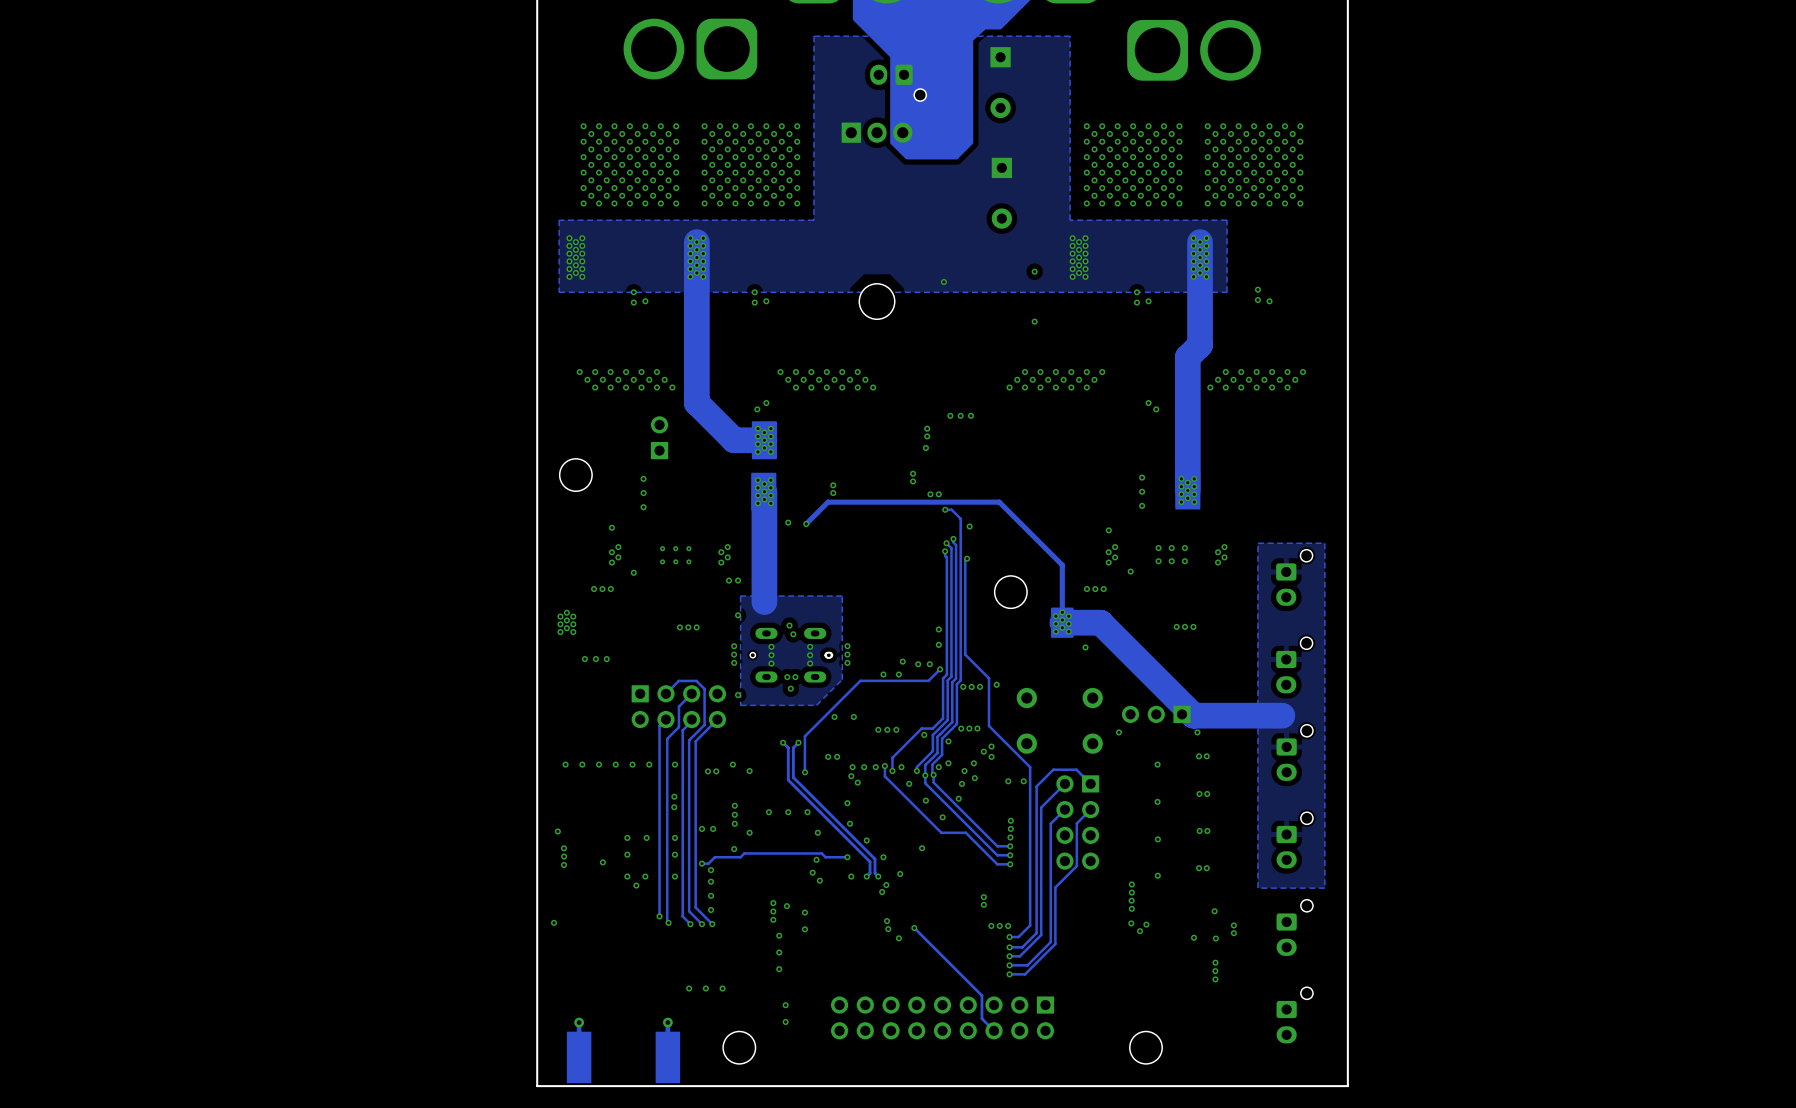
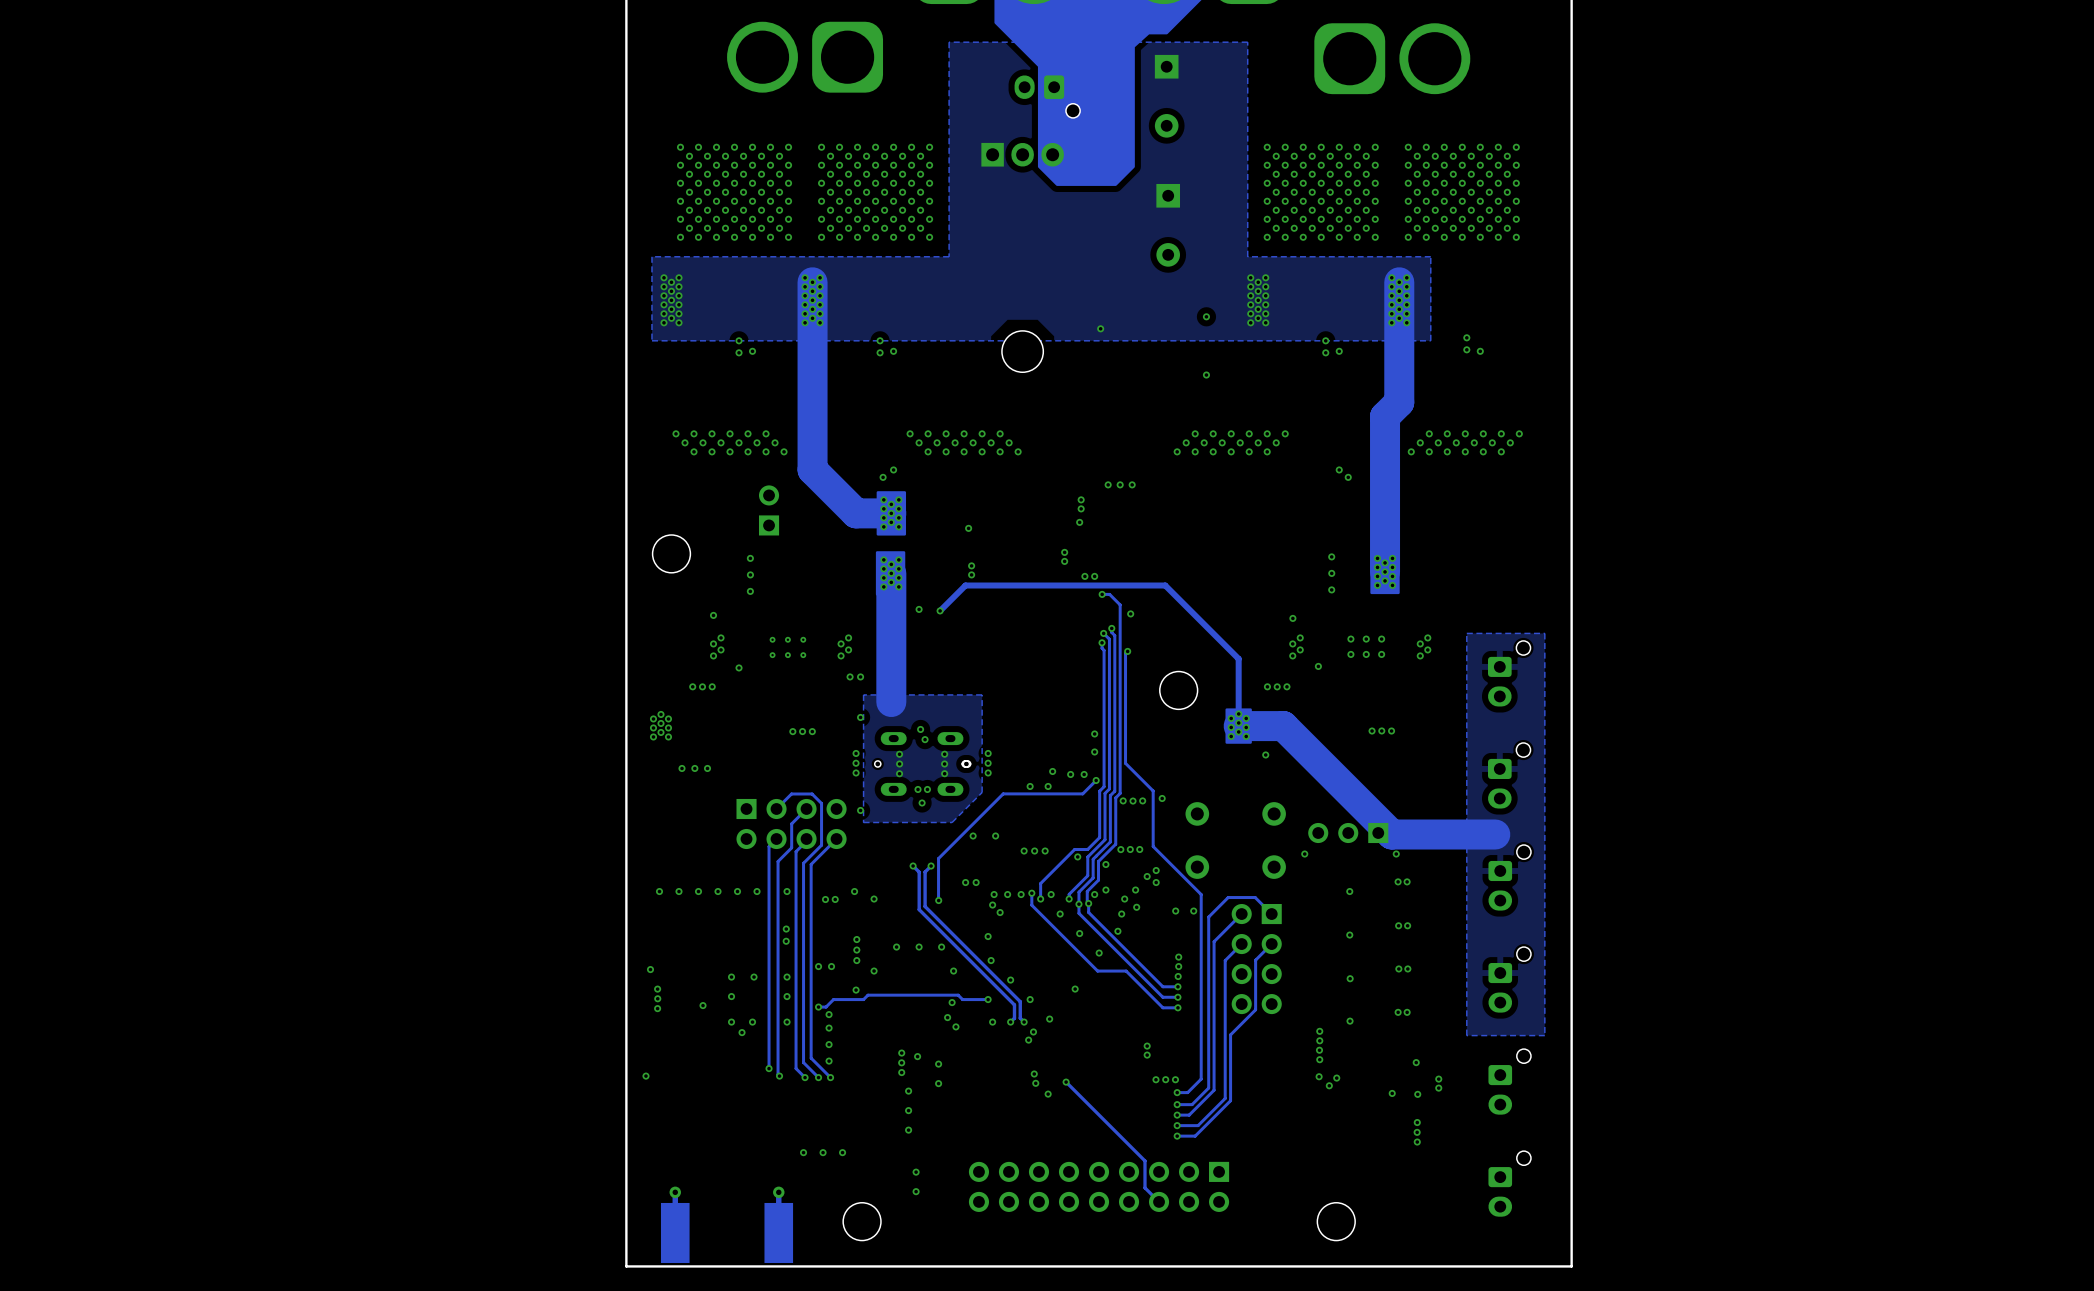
via: none -> (968, 528)

